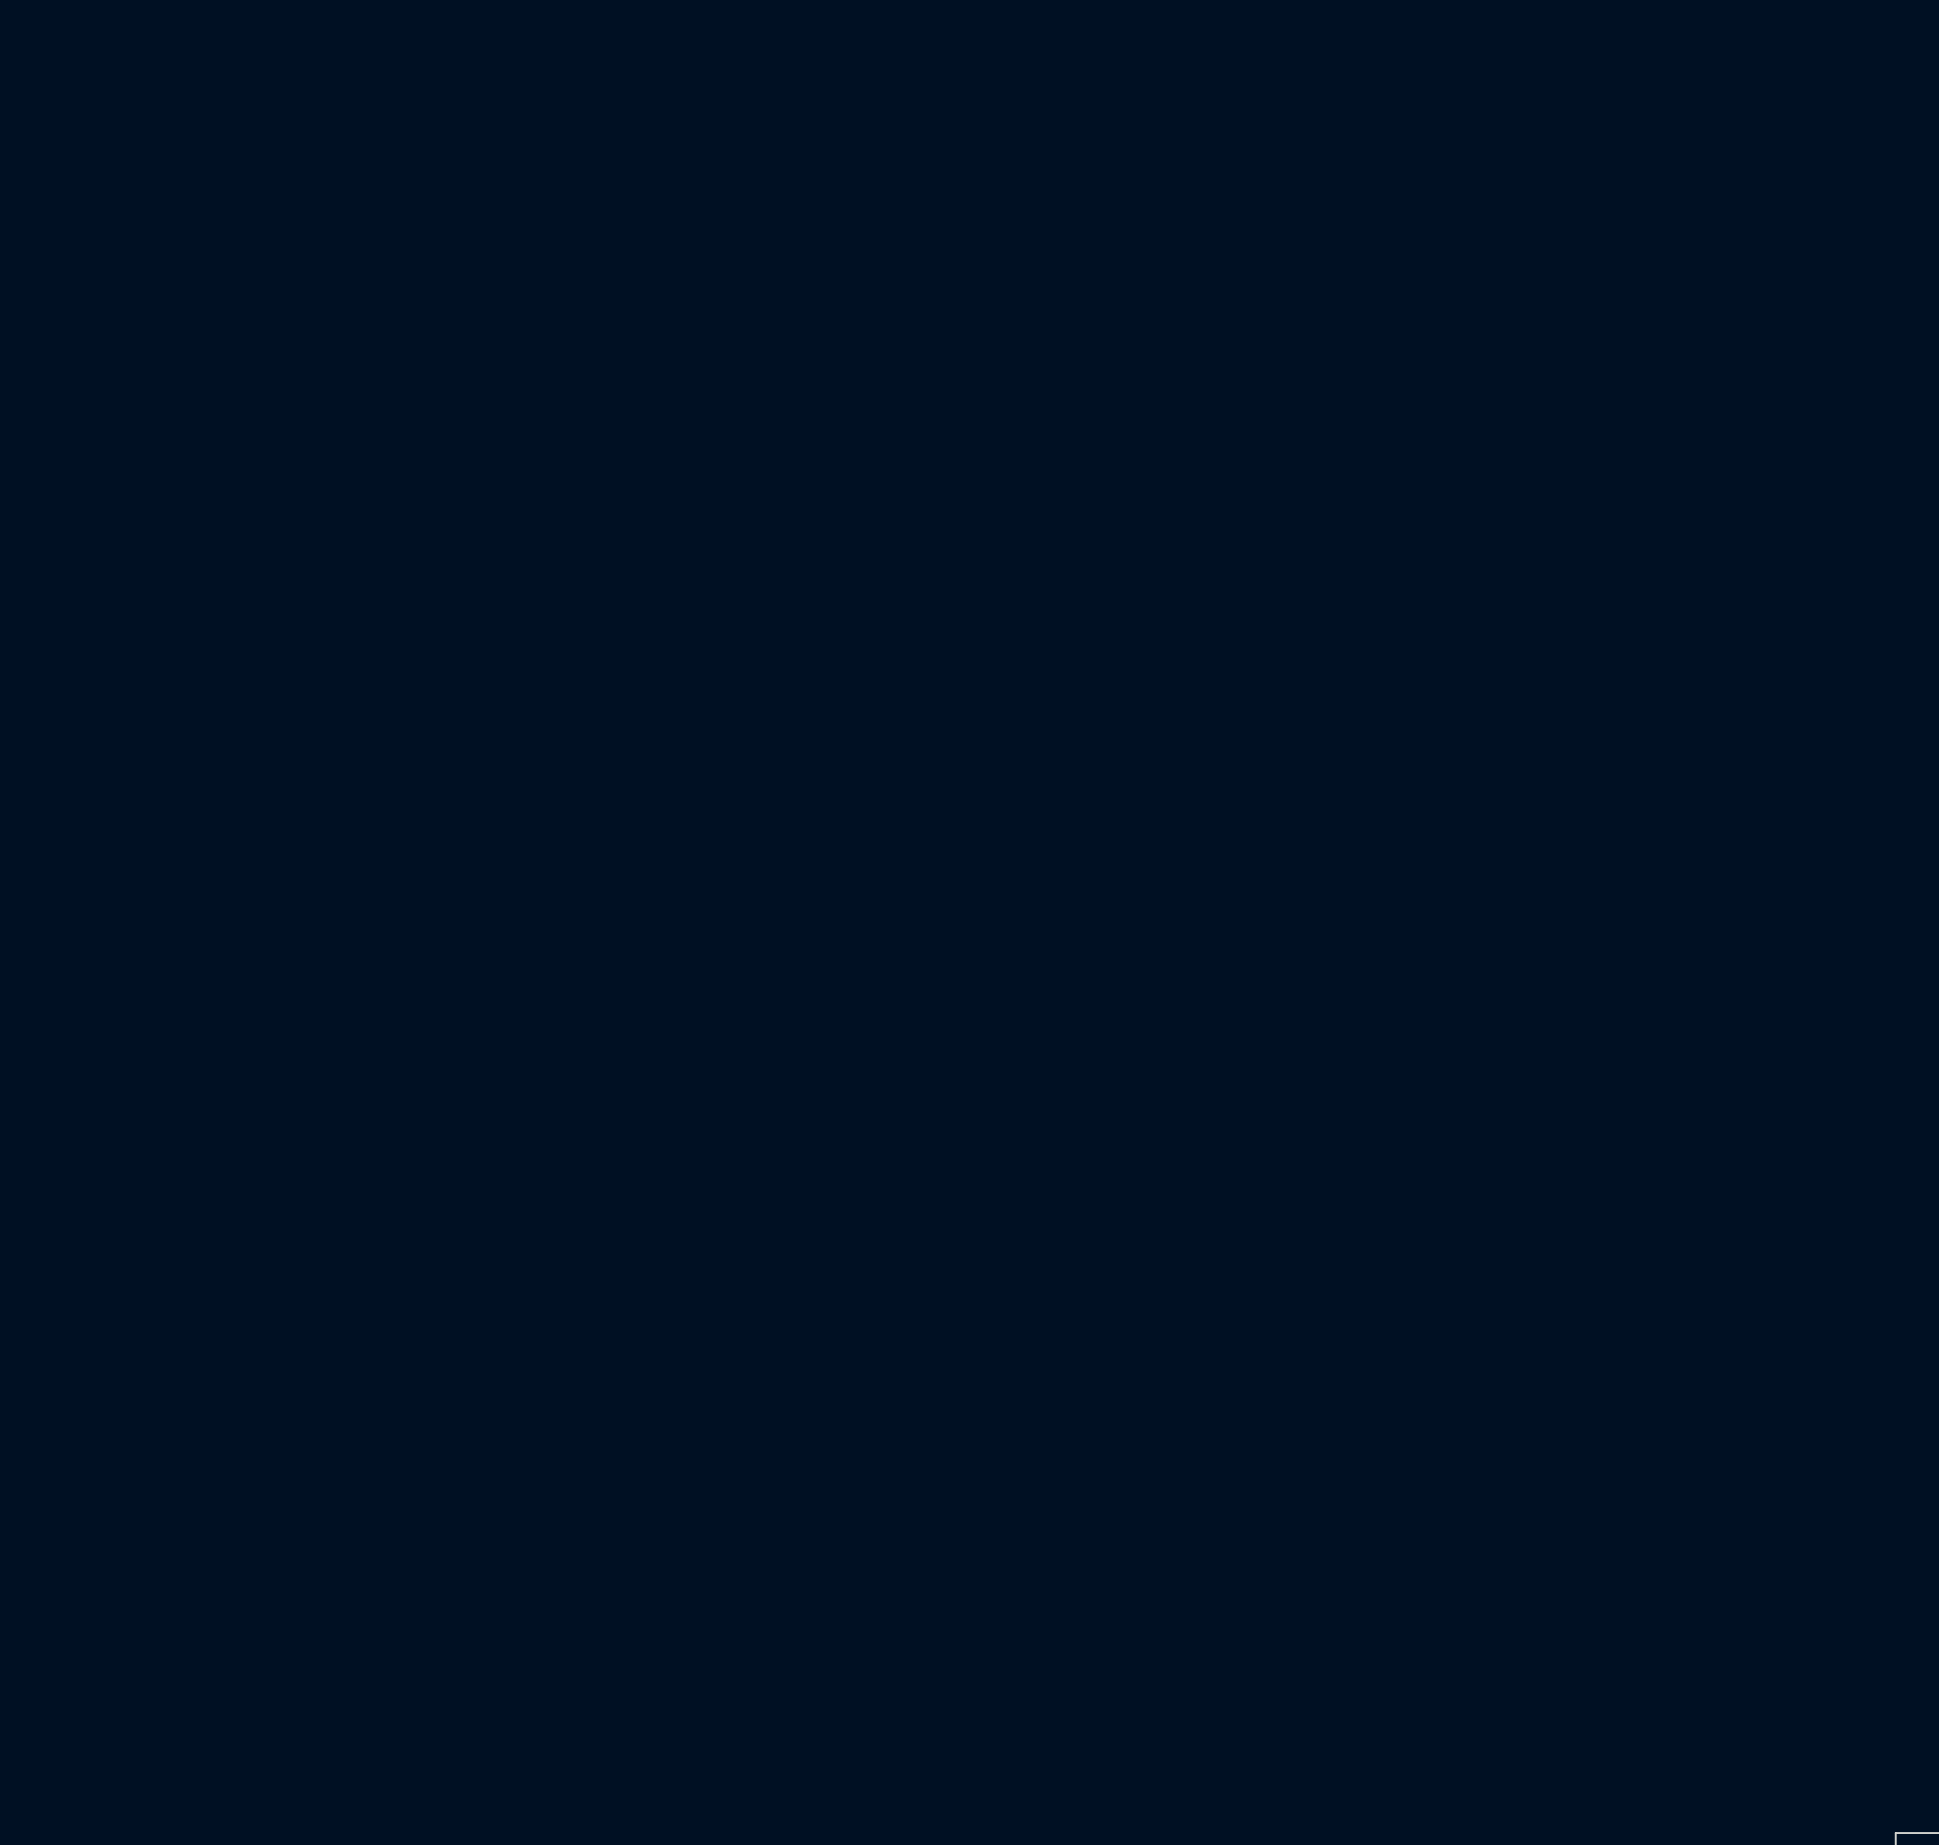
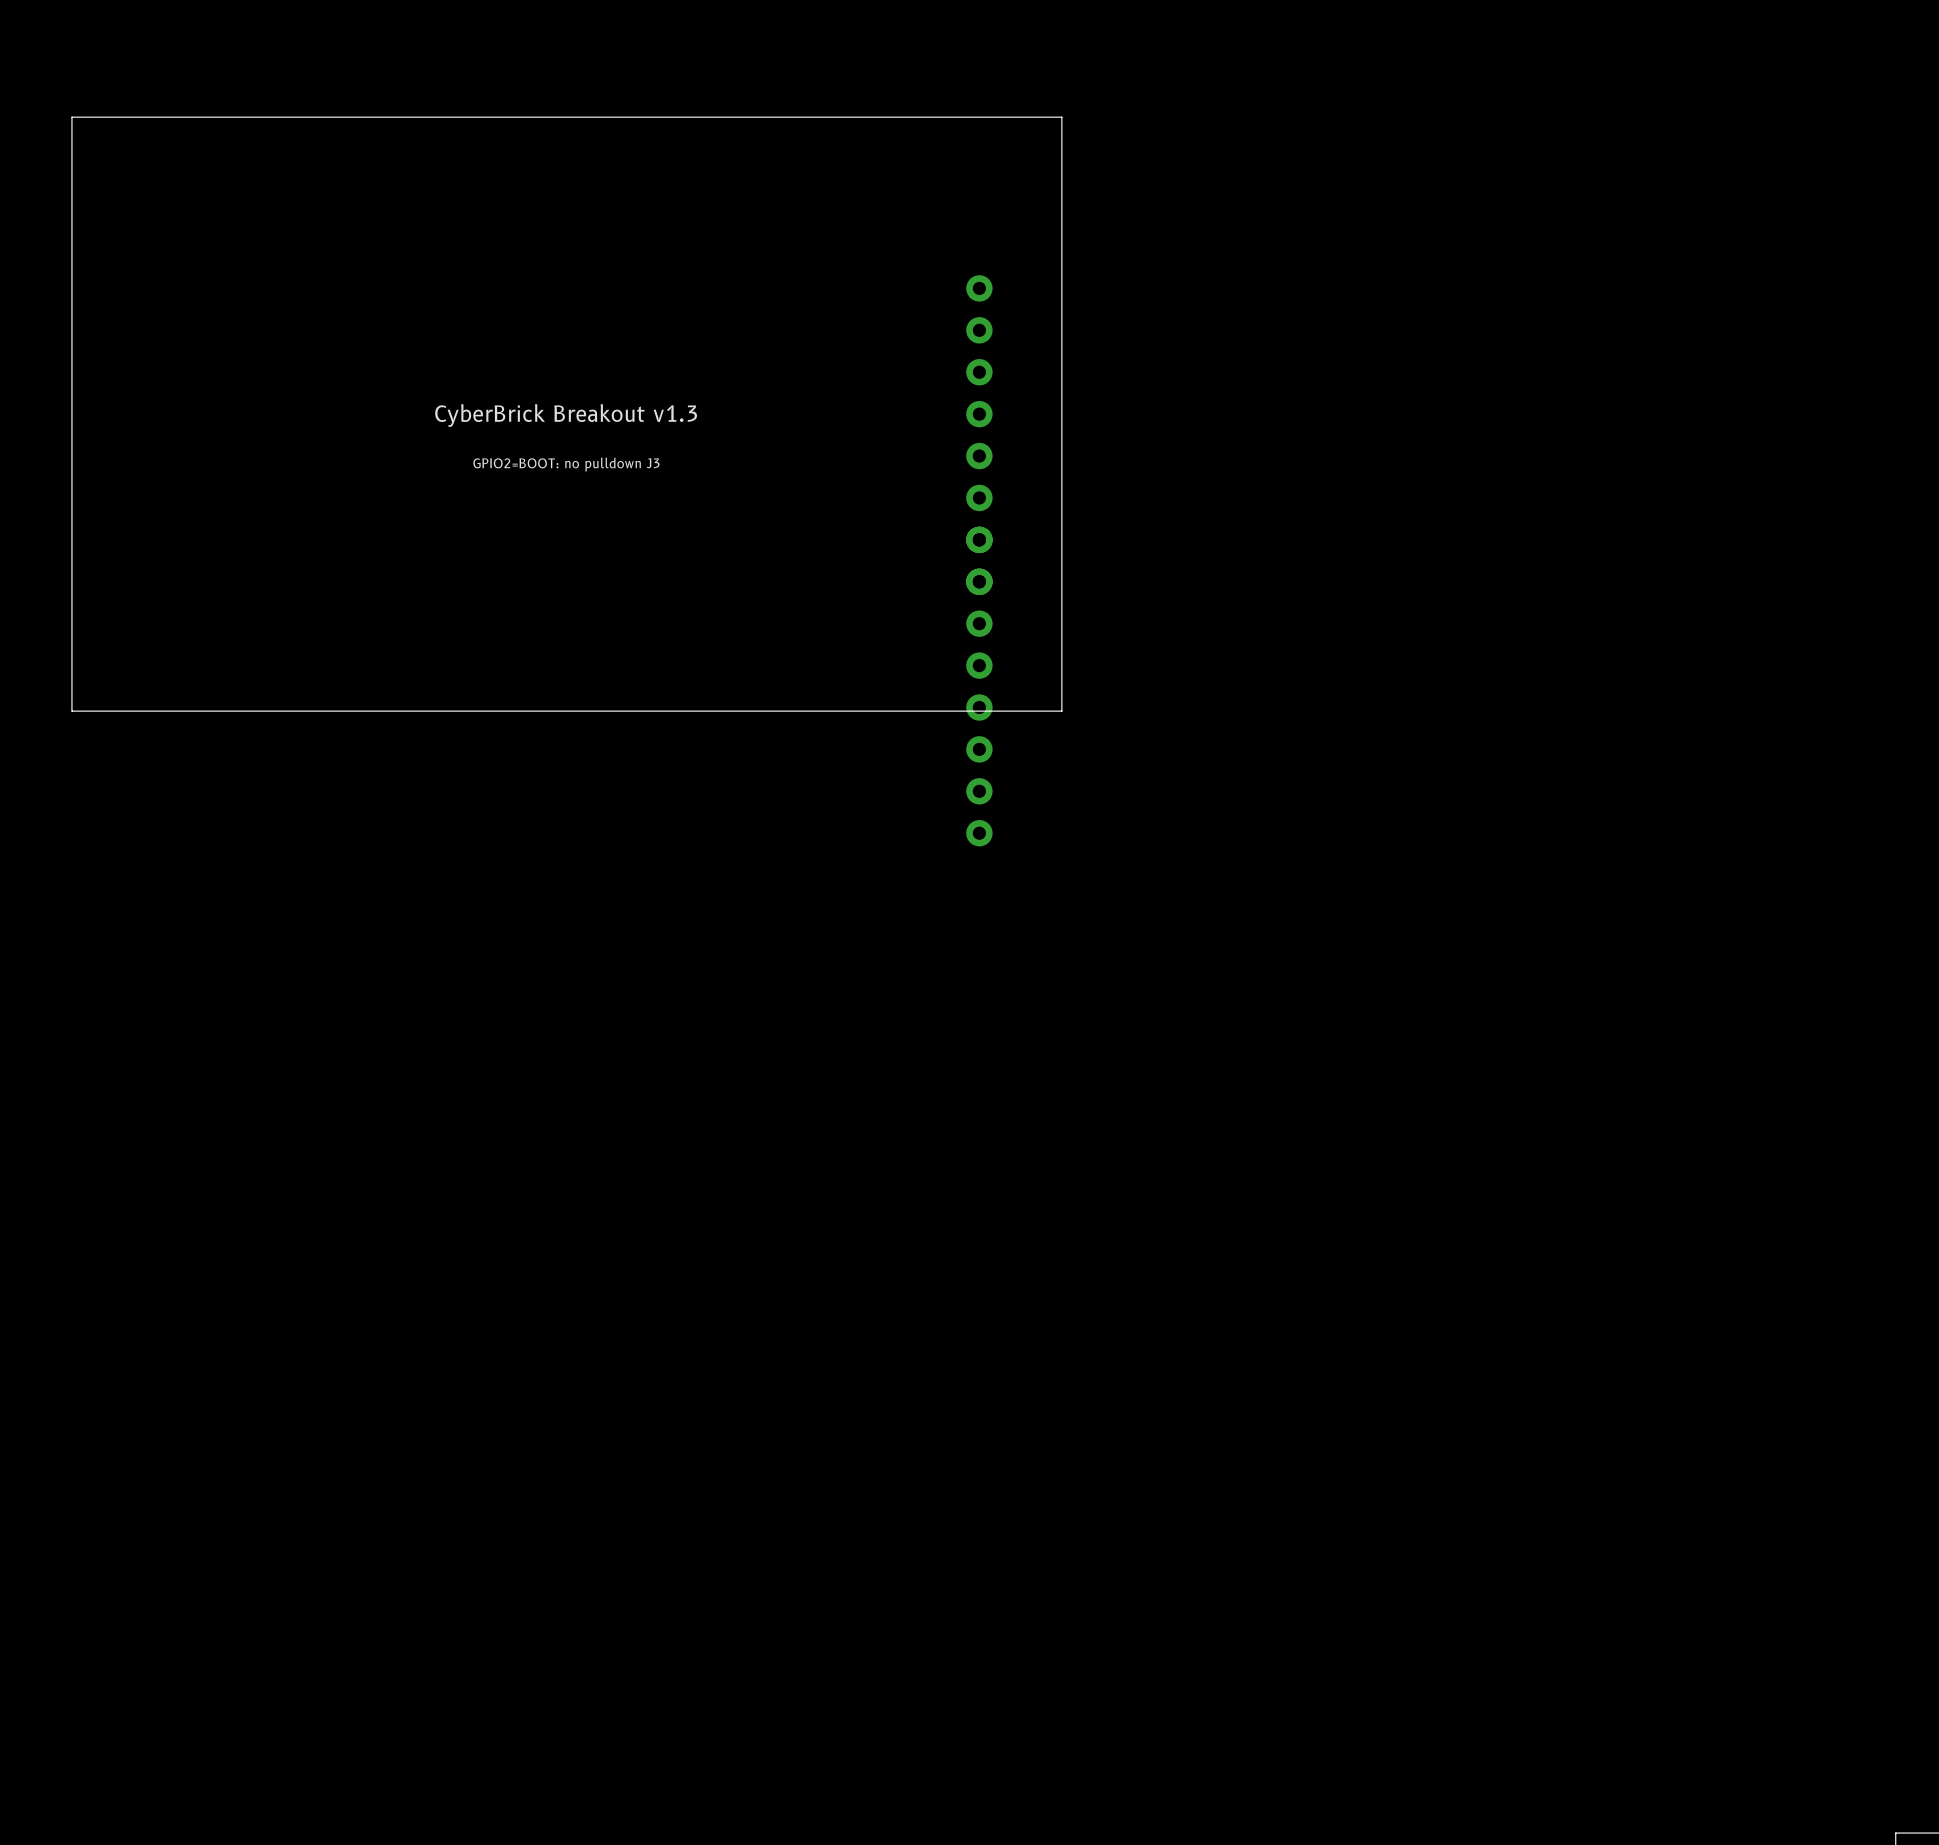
board edge: none -> (71, 117) (1061, 117) (1061, 711) (71, 711) (71, 117)
text: none -> CyberBrick Breakout v1.3 (566, 415)
part: none -> (979, 435)
text: none -> GPIO2=BOOT: no pulldown J3 (566, 464)
part: none -> (979, 686)

